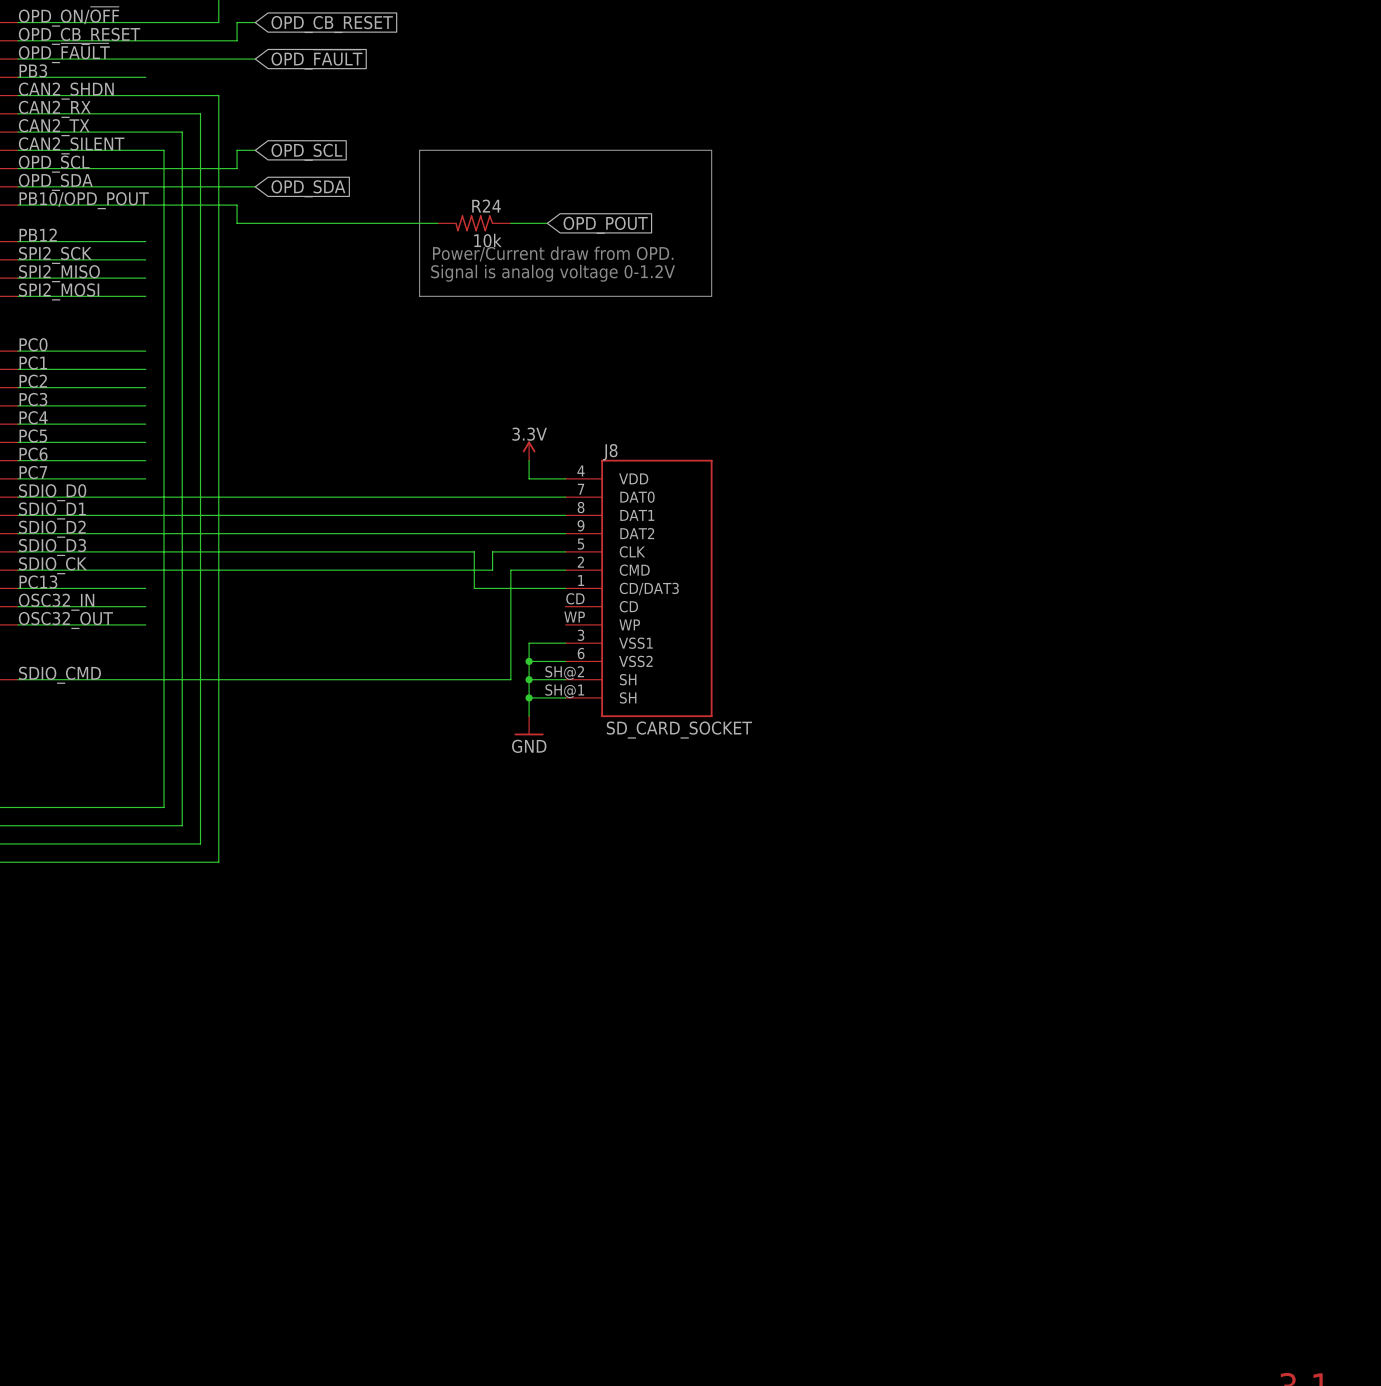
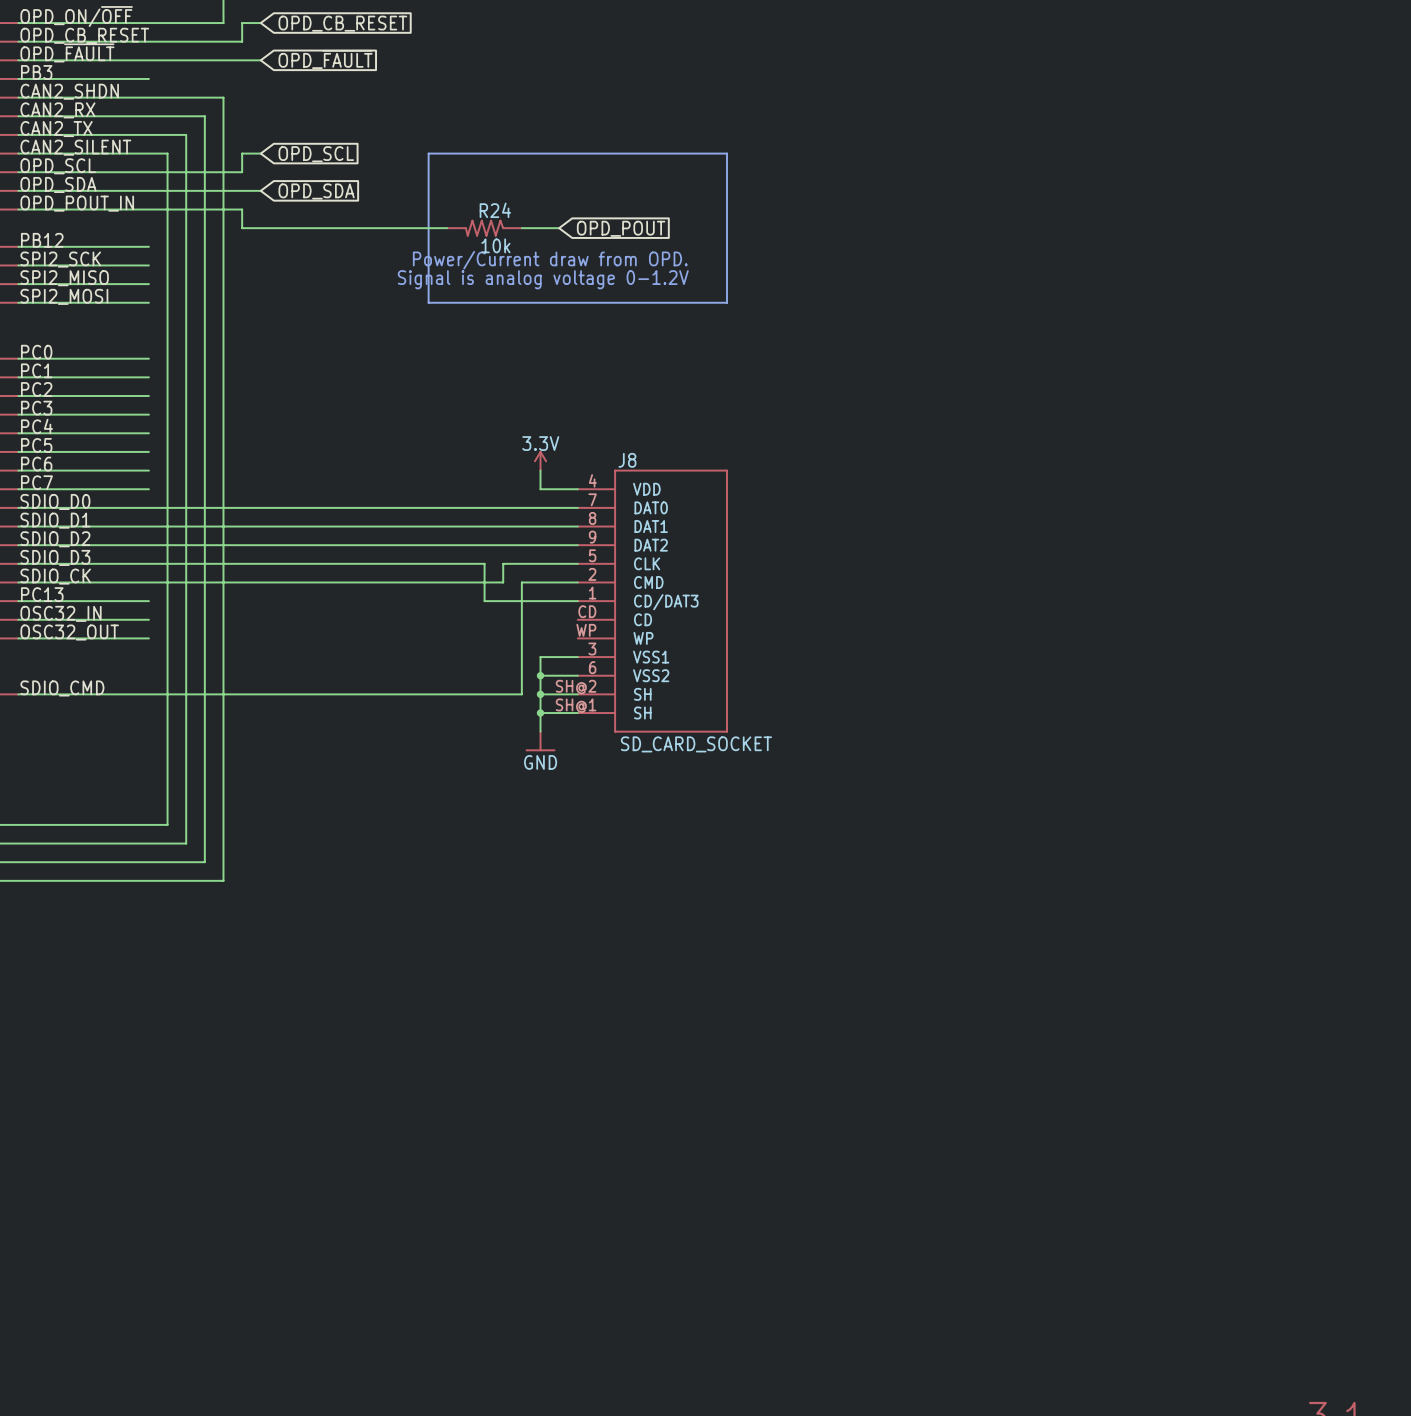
label: PB10/OPD_POUT (84, 200) -> OPD_POUT_IN (77, 203)

